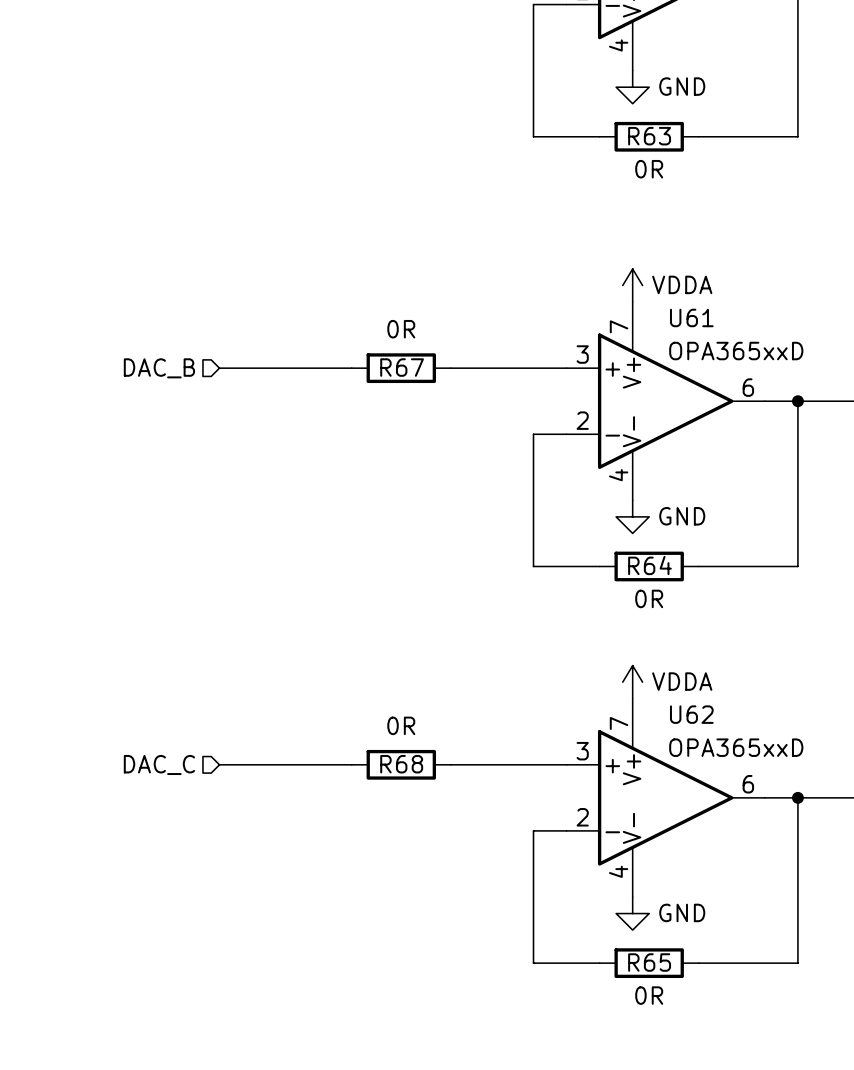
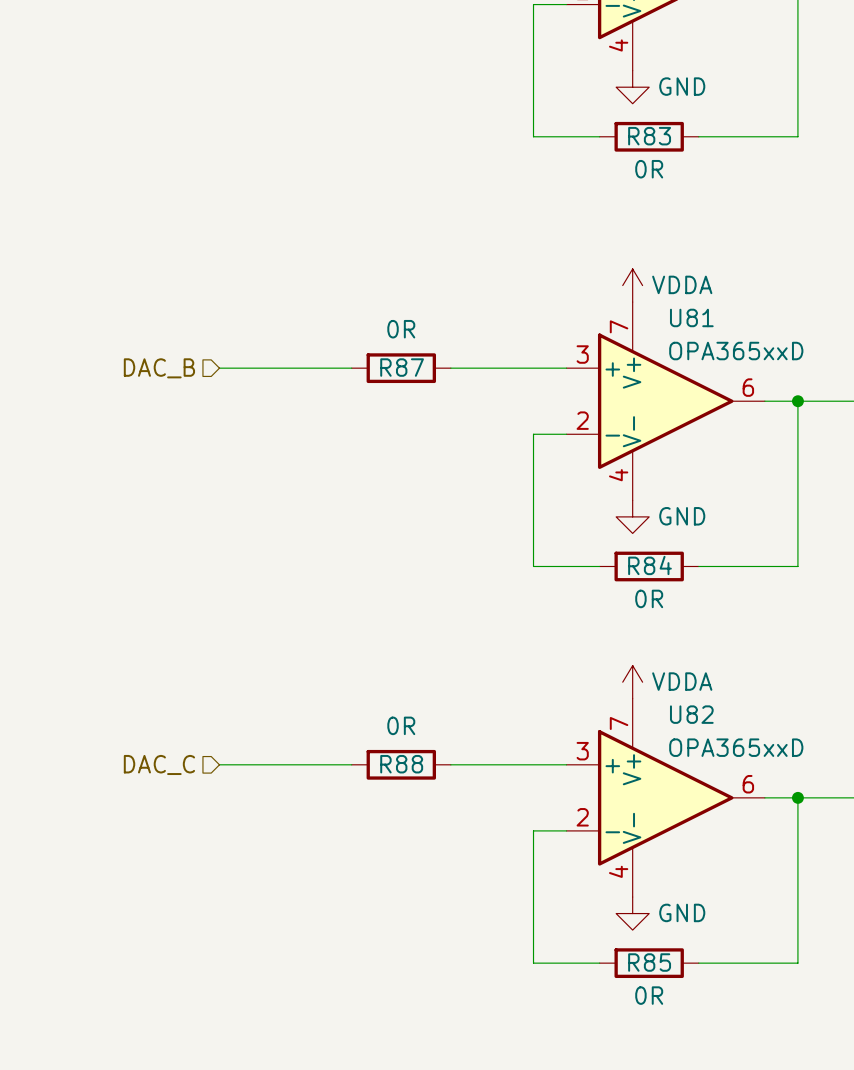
R63 name: R63 (649, 136) -> R83 (649, 136)
U61 name: U61 (691, 317) -> U81 (691, 317)
R67 name: R67 (402, 367) -> R87 (402, 367)
R64 name: R64 (649, 565) -> R84 (649, 565)
U62 name: U62 (691, 714) -> U82 (691, 714)
R68 name: R68 (401, 764) -> R88 (401, 764)
R65 name: R65 (649, 962) -> R85 (649, 962)

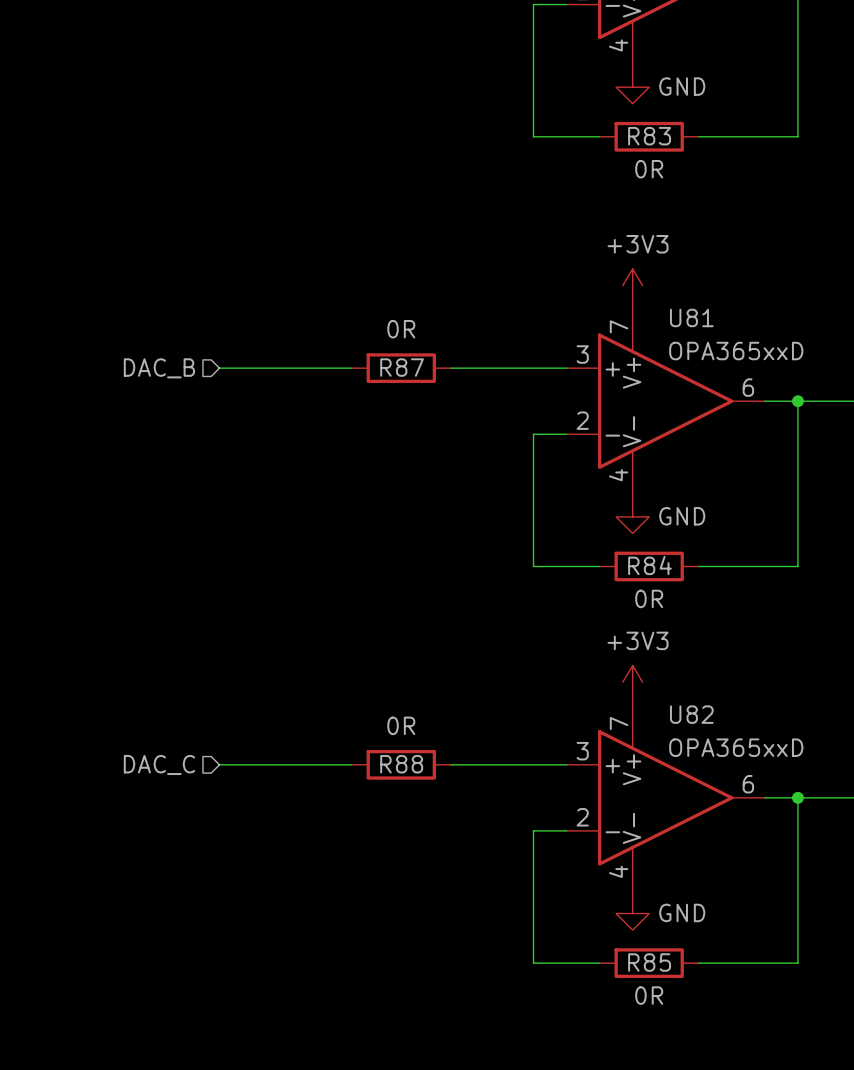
power symbol: VDDA (632, 285) -> +3V3 (632, 285)
power symbol: VDDA (632, 682) -> +3V3 (632, 682)

